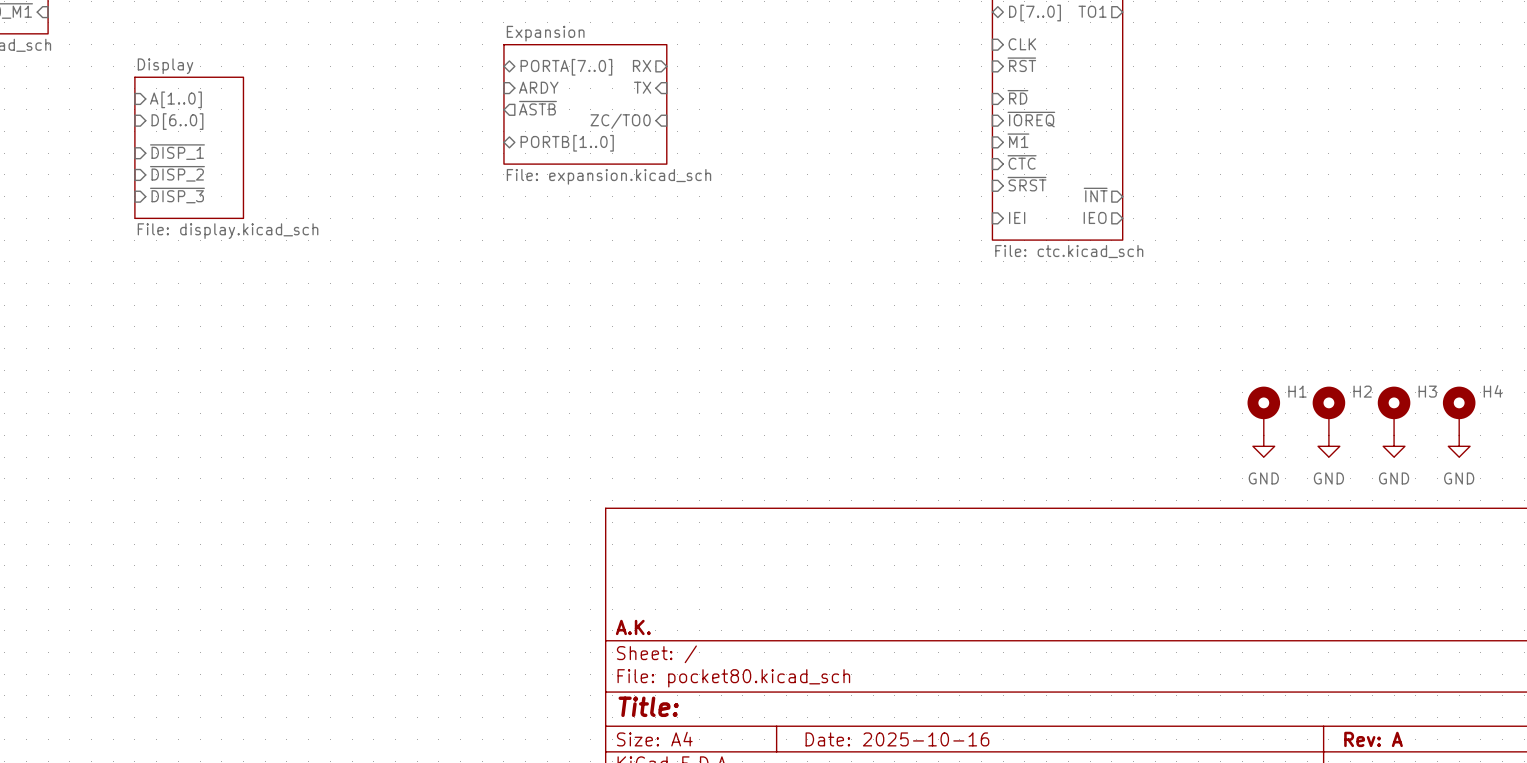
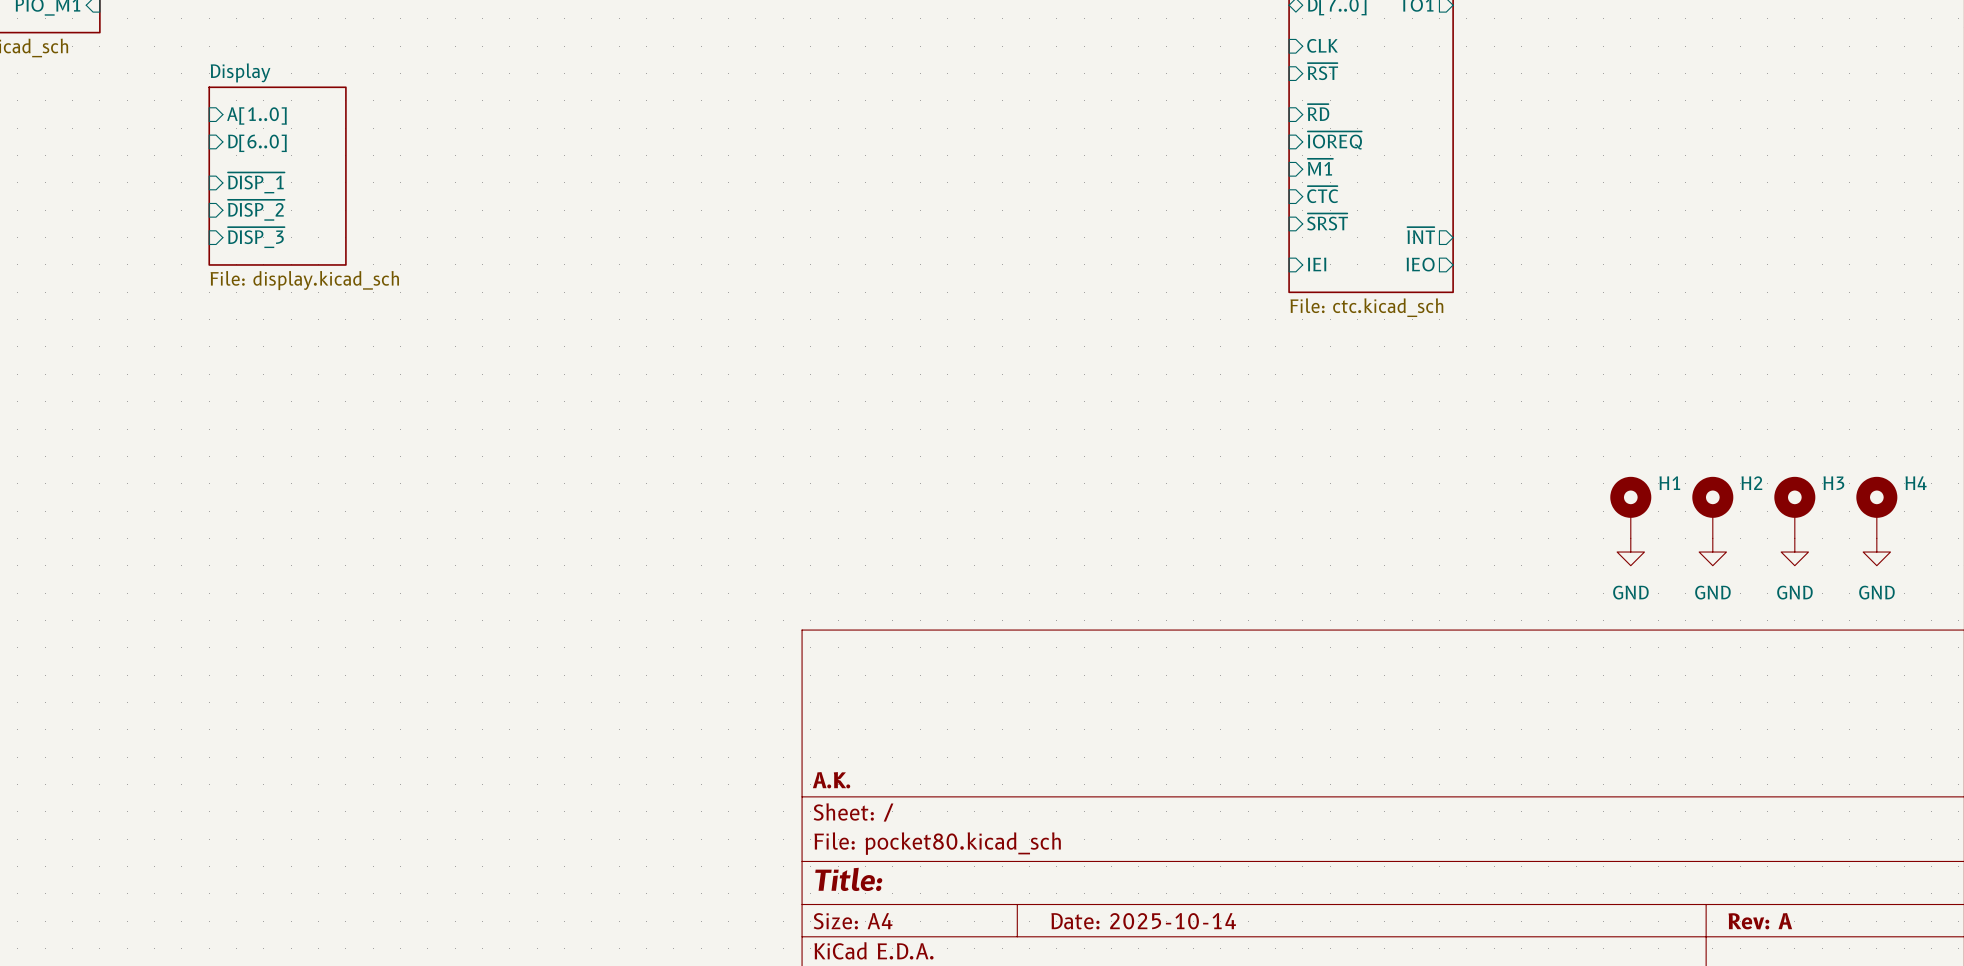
sheet pin: RX (642, 65) -> none
sheet pin: PORTA[7..0] (566, 67) -> none
sheet pin: ARDY (538, 87) -> none
sheet pin: TX (642, 87) -> none
sheet Expansion: File: expansion.kicad_sch (585, 104) -> none
sheet pin: ~{ASTB} (537, 108) -> none
sheet pin: ZC/TO0 (620, 121) -> none
sheet pin: PORTB[1..0] (567, 143) -> none
title block: Date: 2025-10-16 (897, 739) -> Date: 2025-10-14 (1143, 921)

